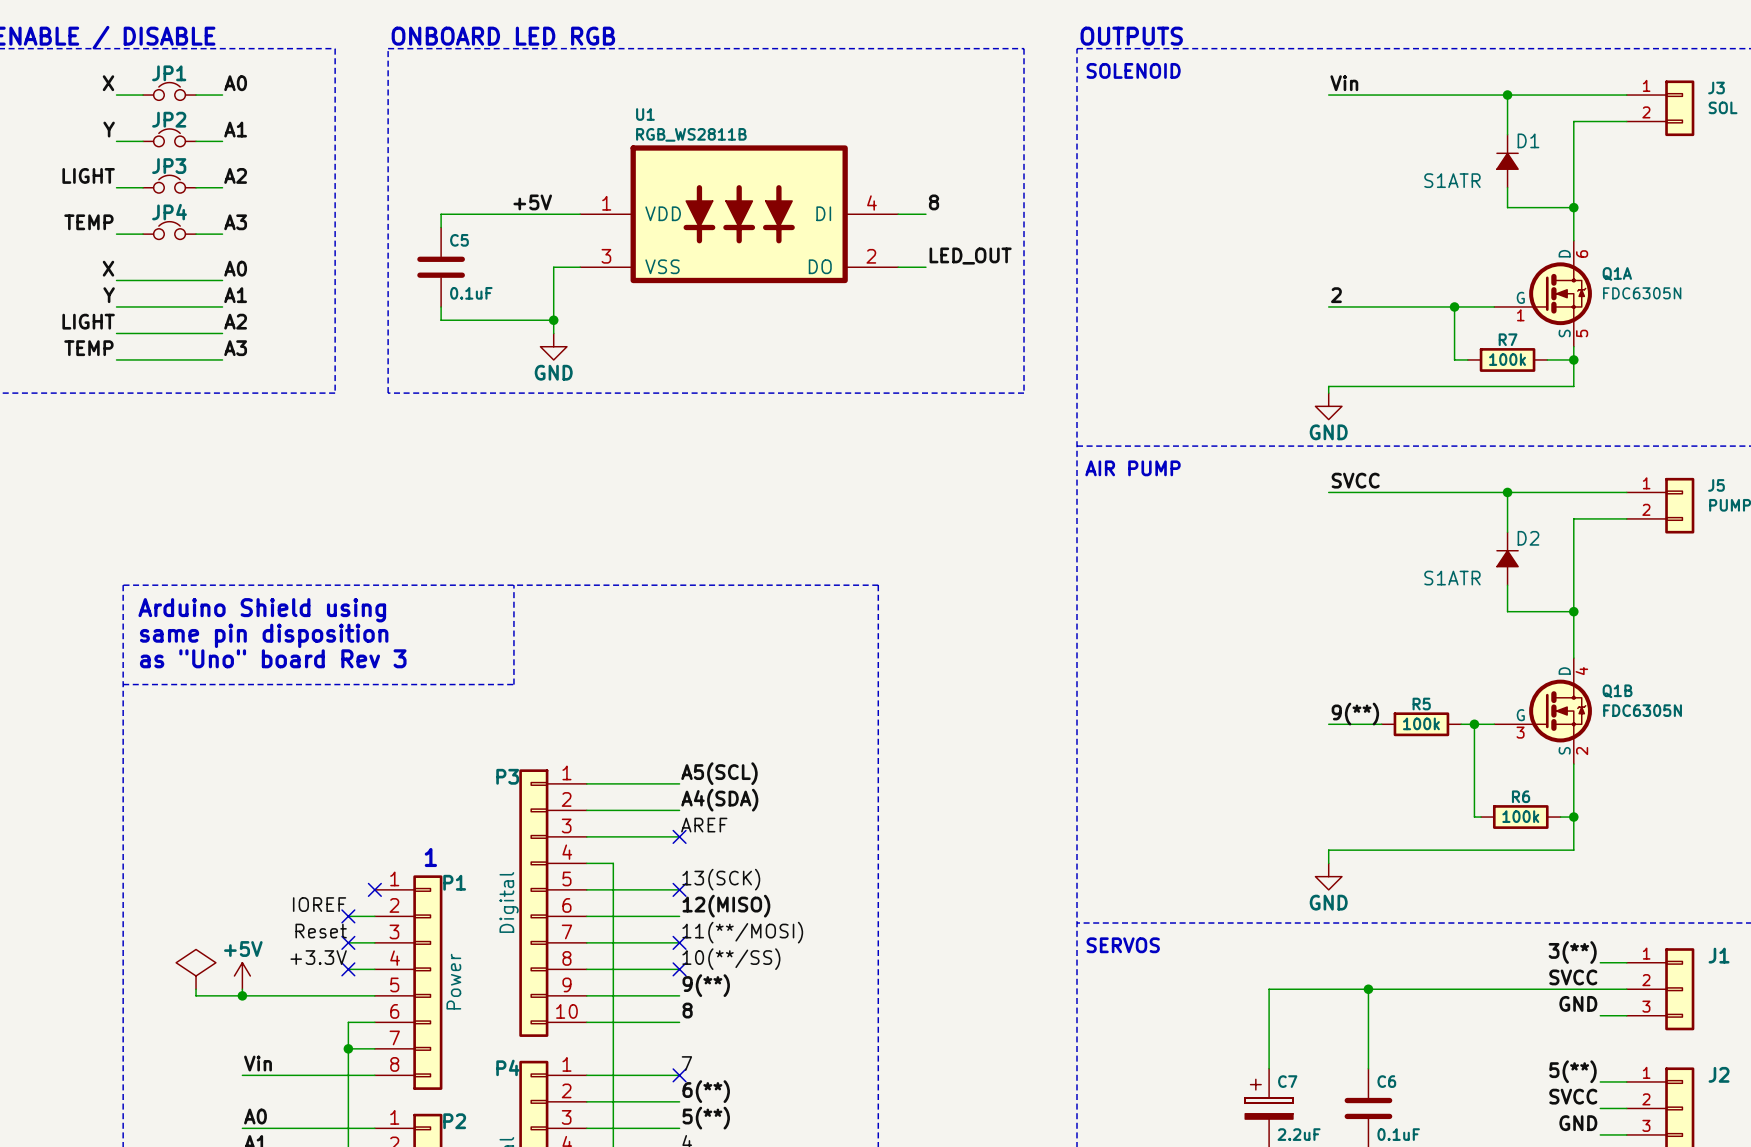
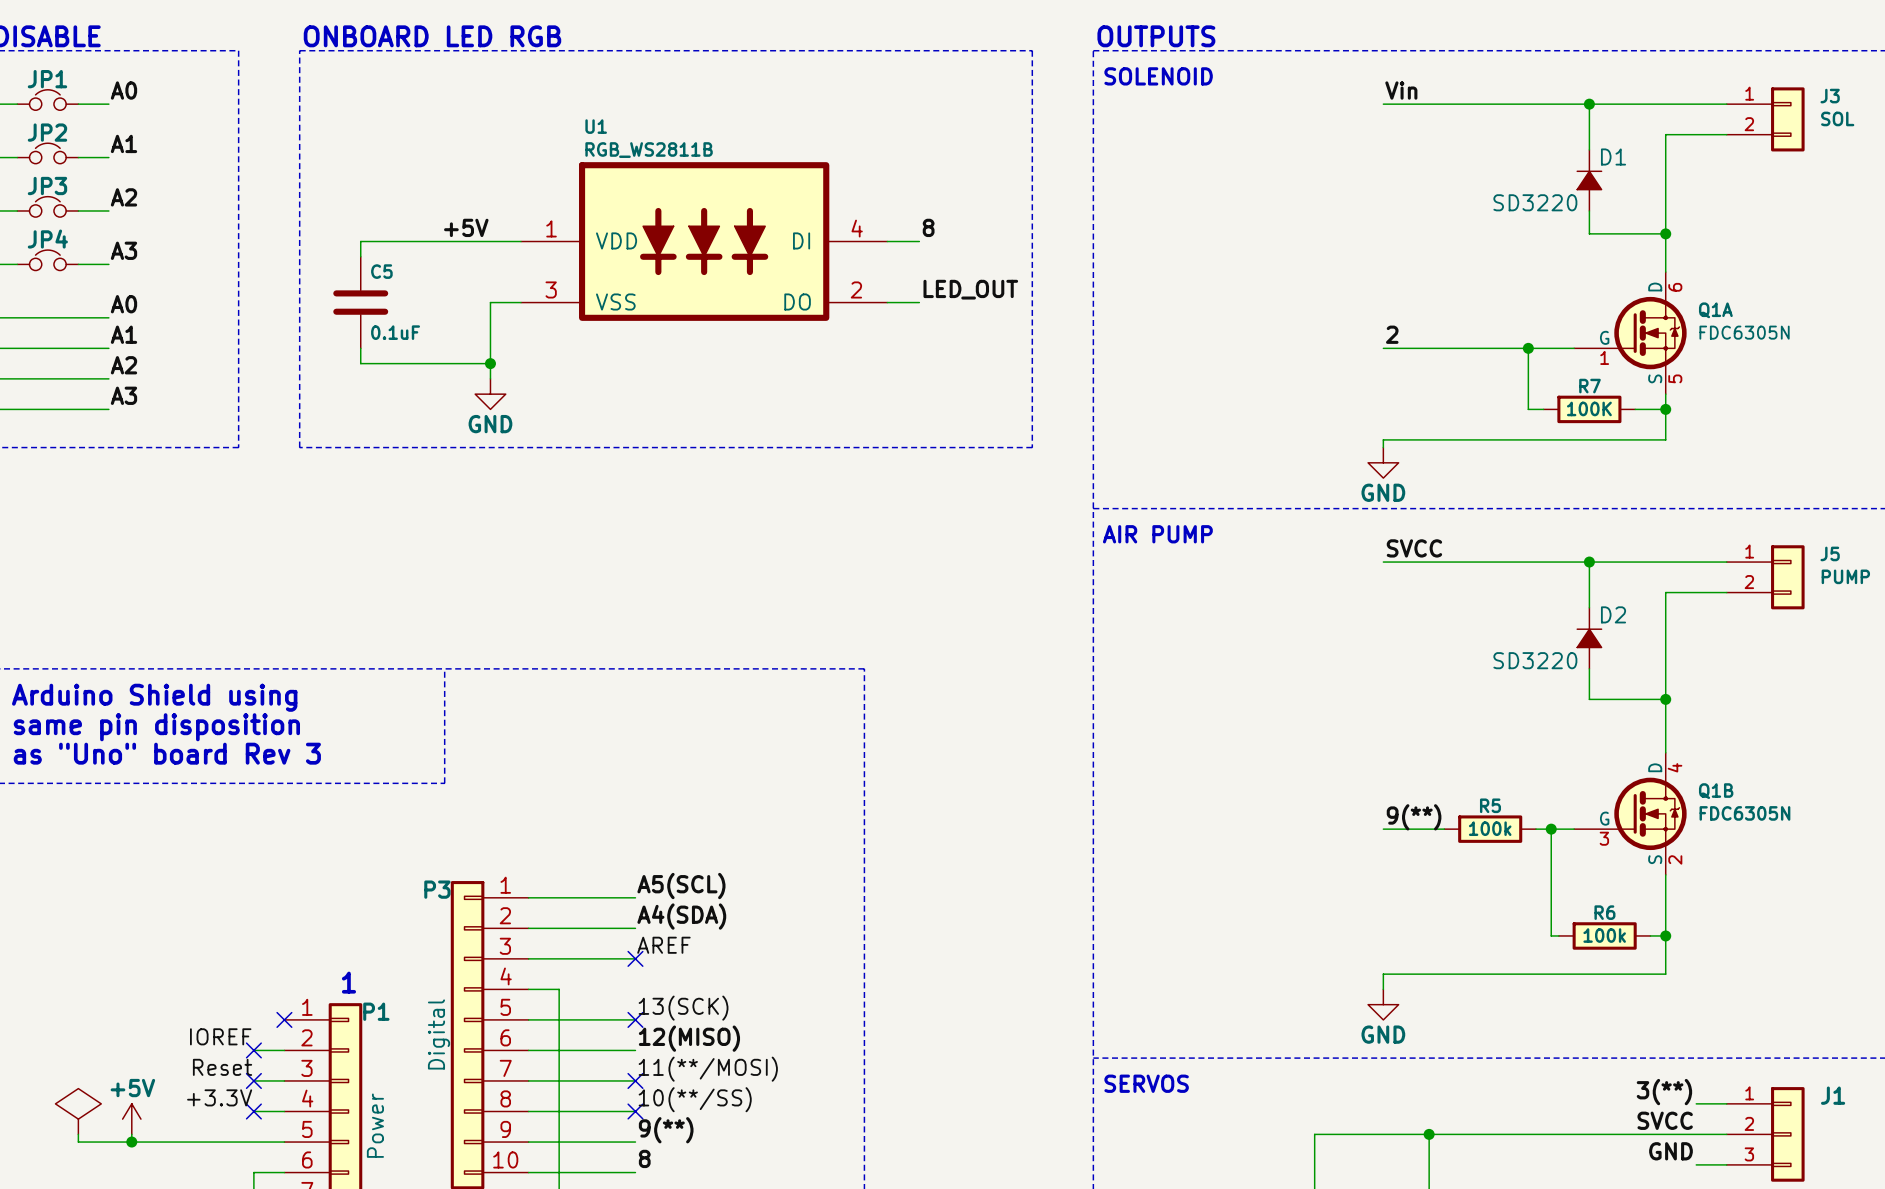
D1 value: S1ATR (1452, 180) -> SD3220 (1535, 202)
R7 value: 100k (1507, 359) -> 100K (1589, 408)
D2 value: S1ATR (1452, 578) -> SD3220 (1535, 660)

